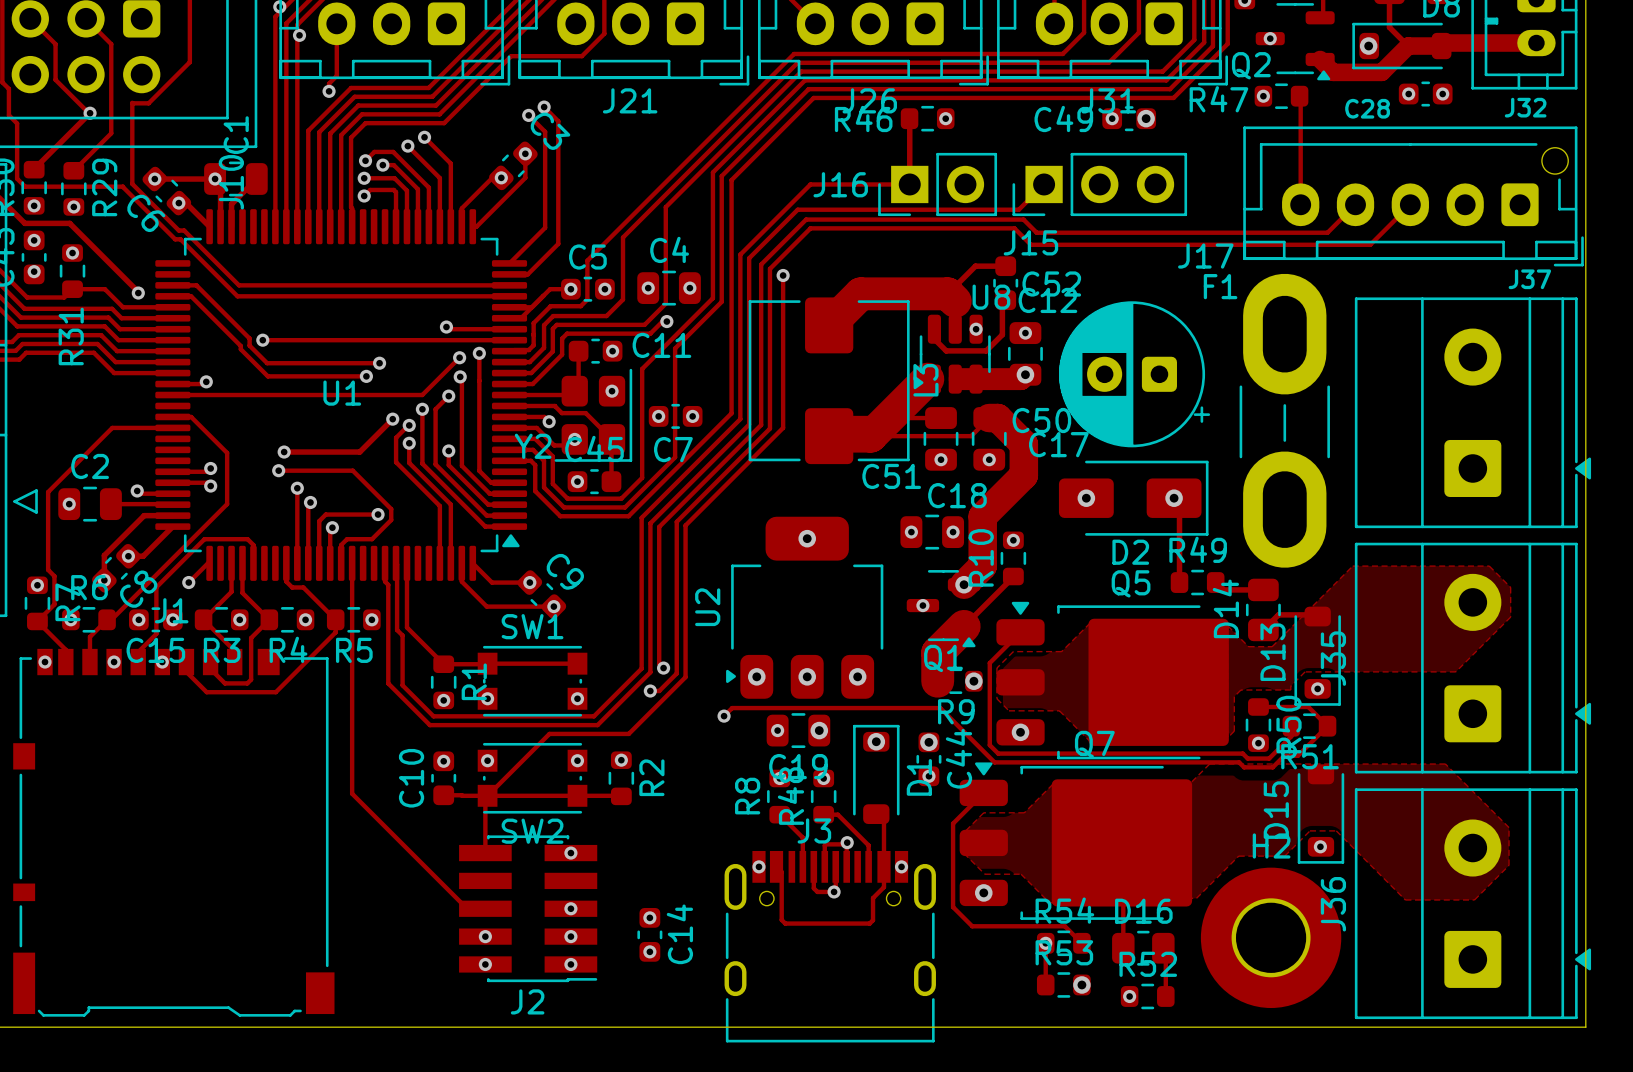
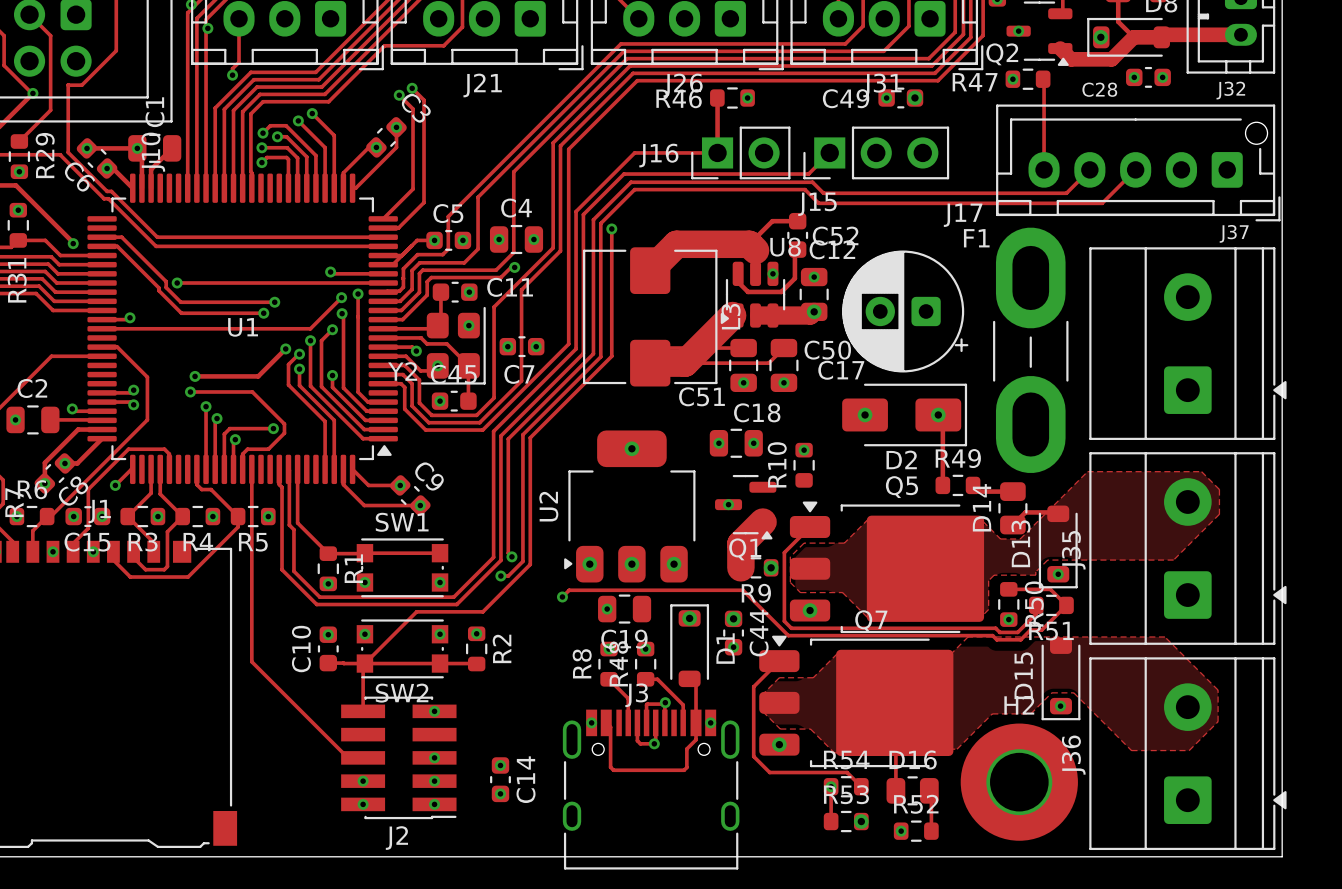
track: (989, 418) (997, 418) (1023, 444) (1023, 475) (982, 516) (982, 566) (964, 584) -> none
track: (1013, 576) (964, 626) -> none
via: (964, 584) -> none
via: (819, 730) -> none

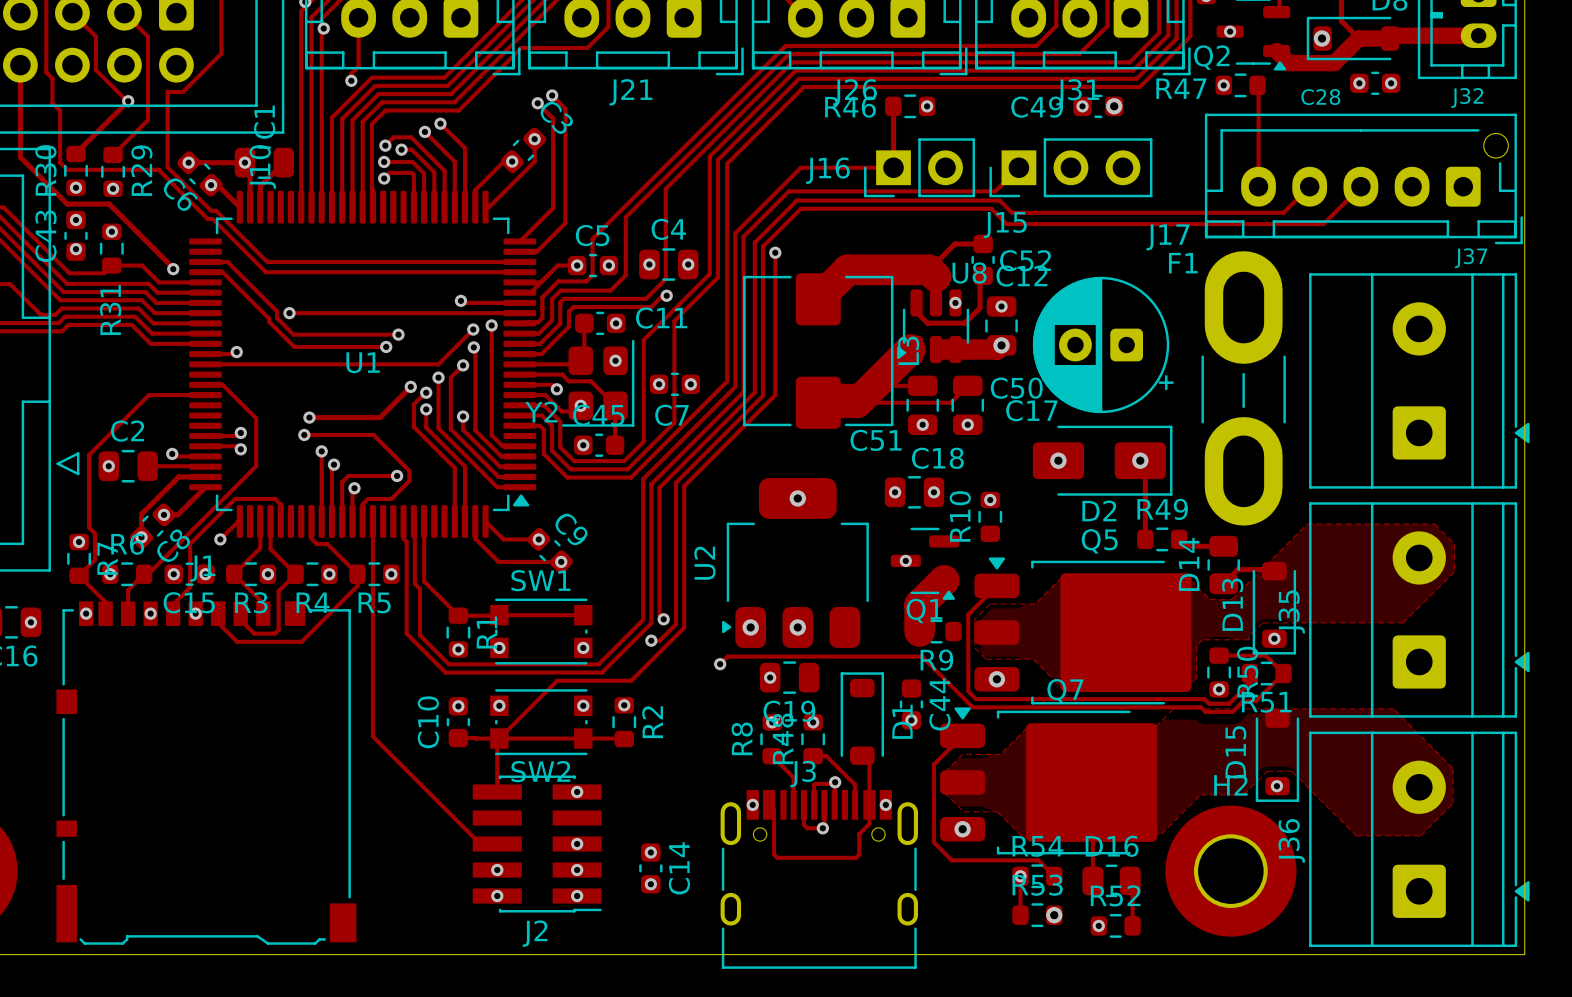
via: (674, 564) -> none
via: (771, 567) -> none
via: (689, 618) -> none
via: (733, 618) -> none

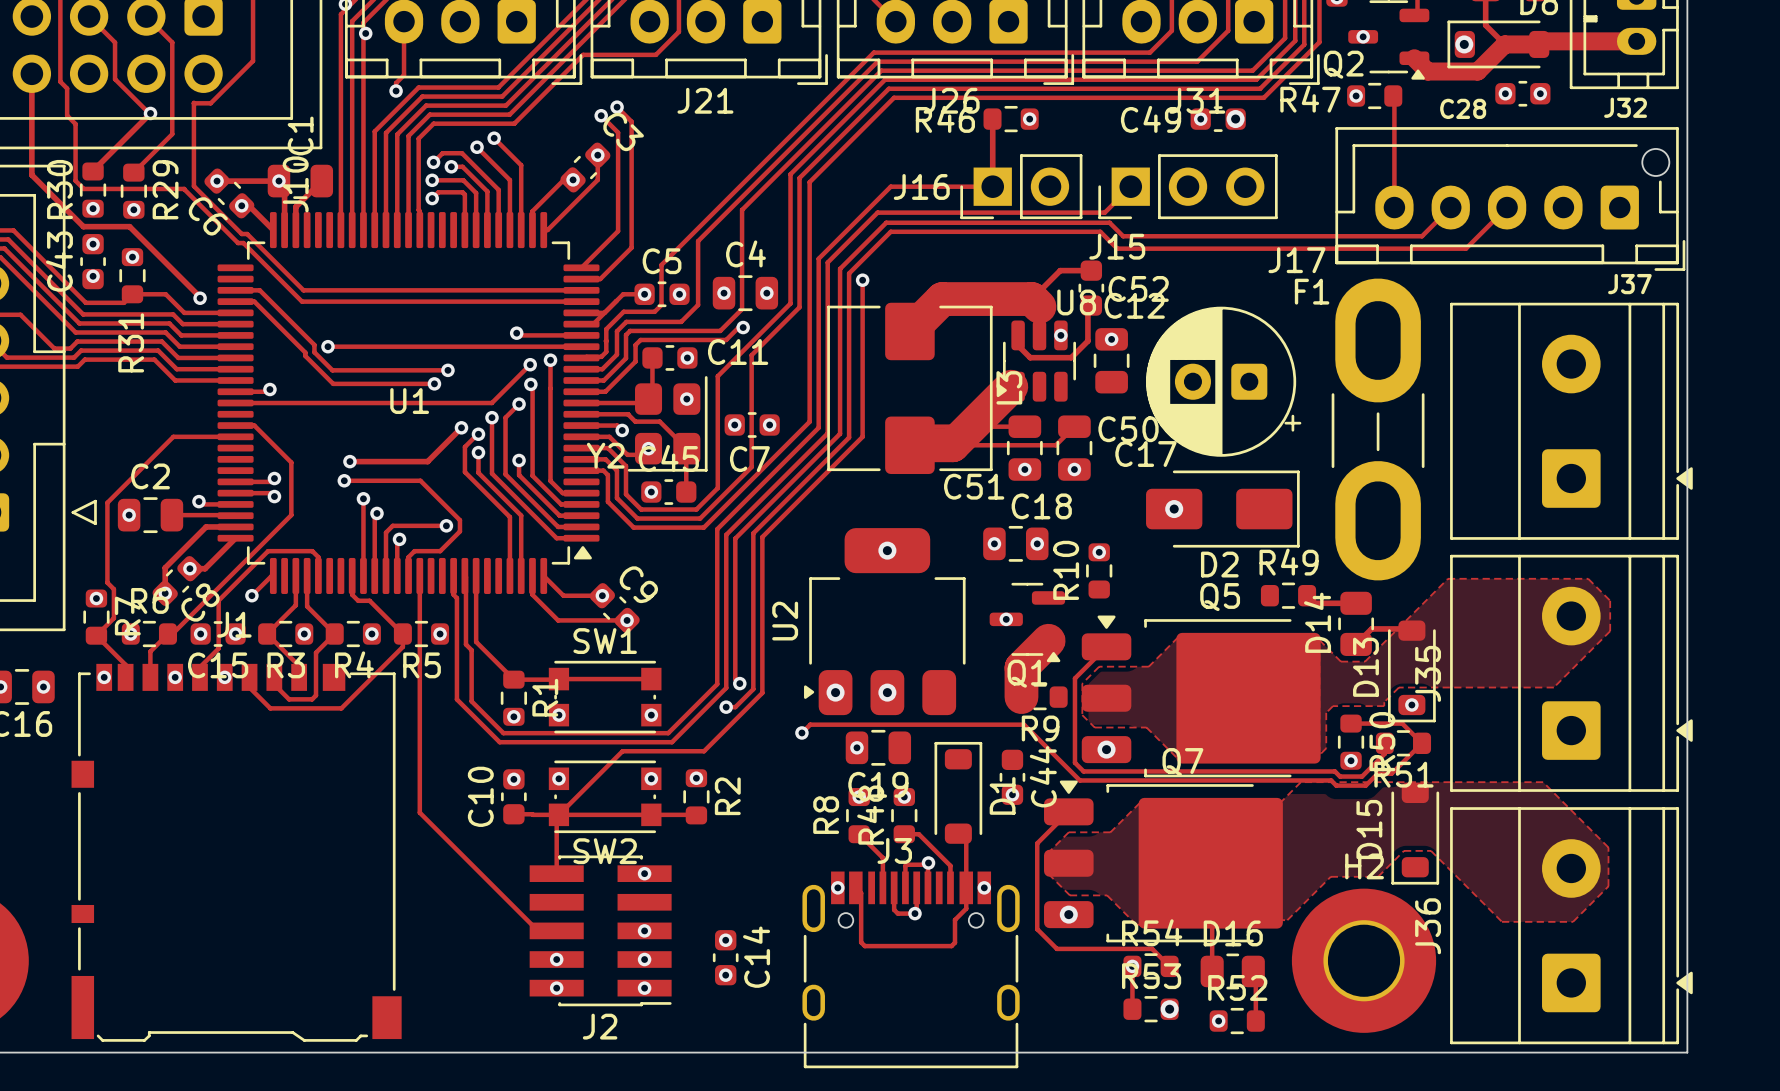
track: (1001, 345) (997, 349) (940, 349) -> none
via: (1001, 345) -> none
track: (1140, 460) (1145, 465) (1145, 539) -> none
via: (1140, 460) -> none
via: (1276, 786) -> none

